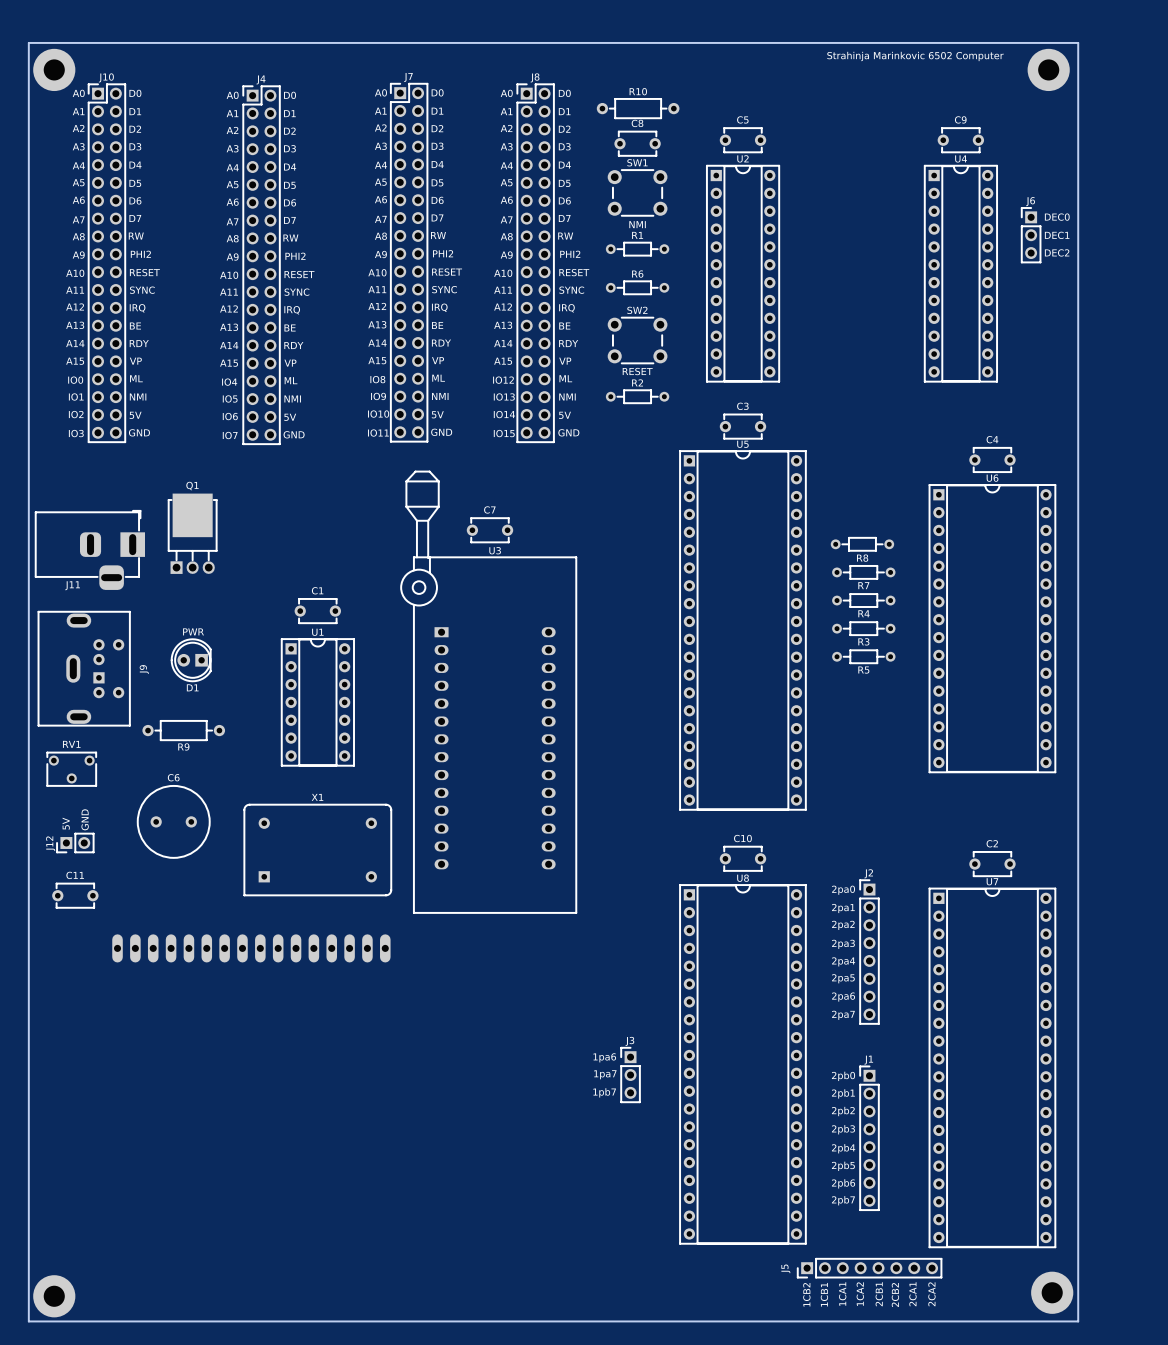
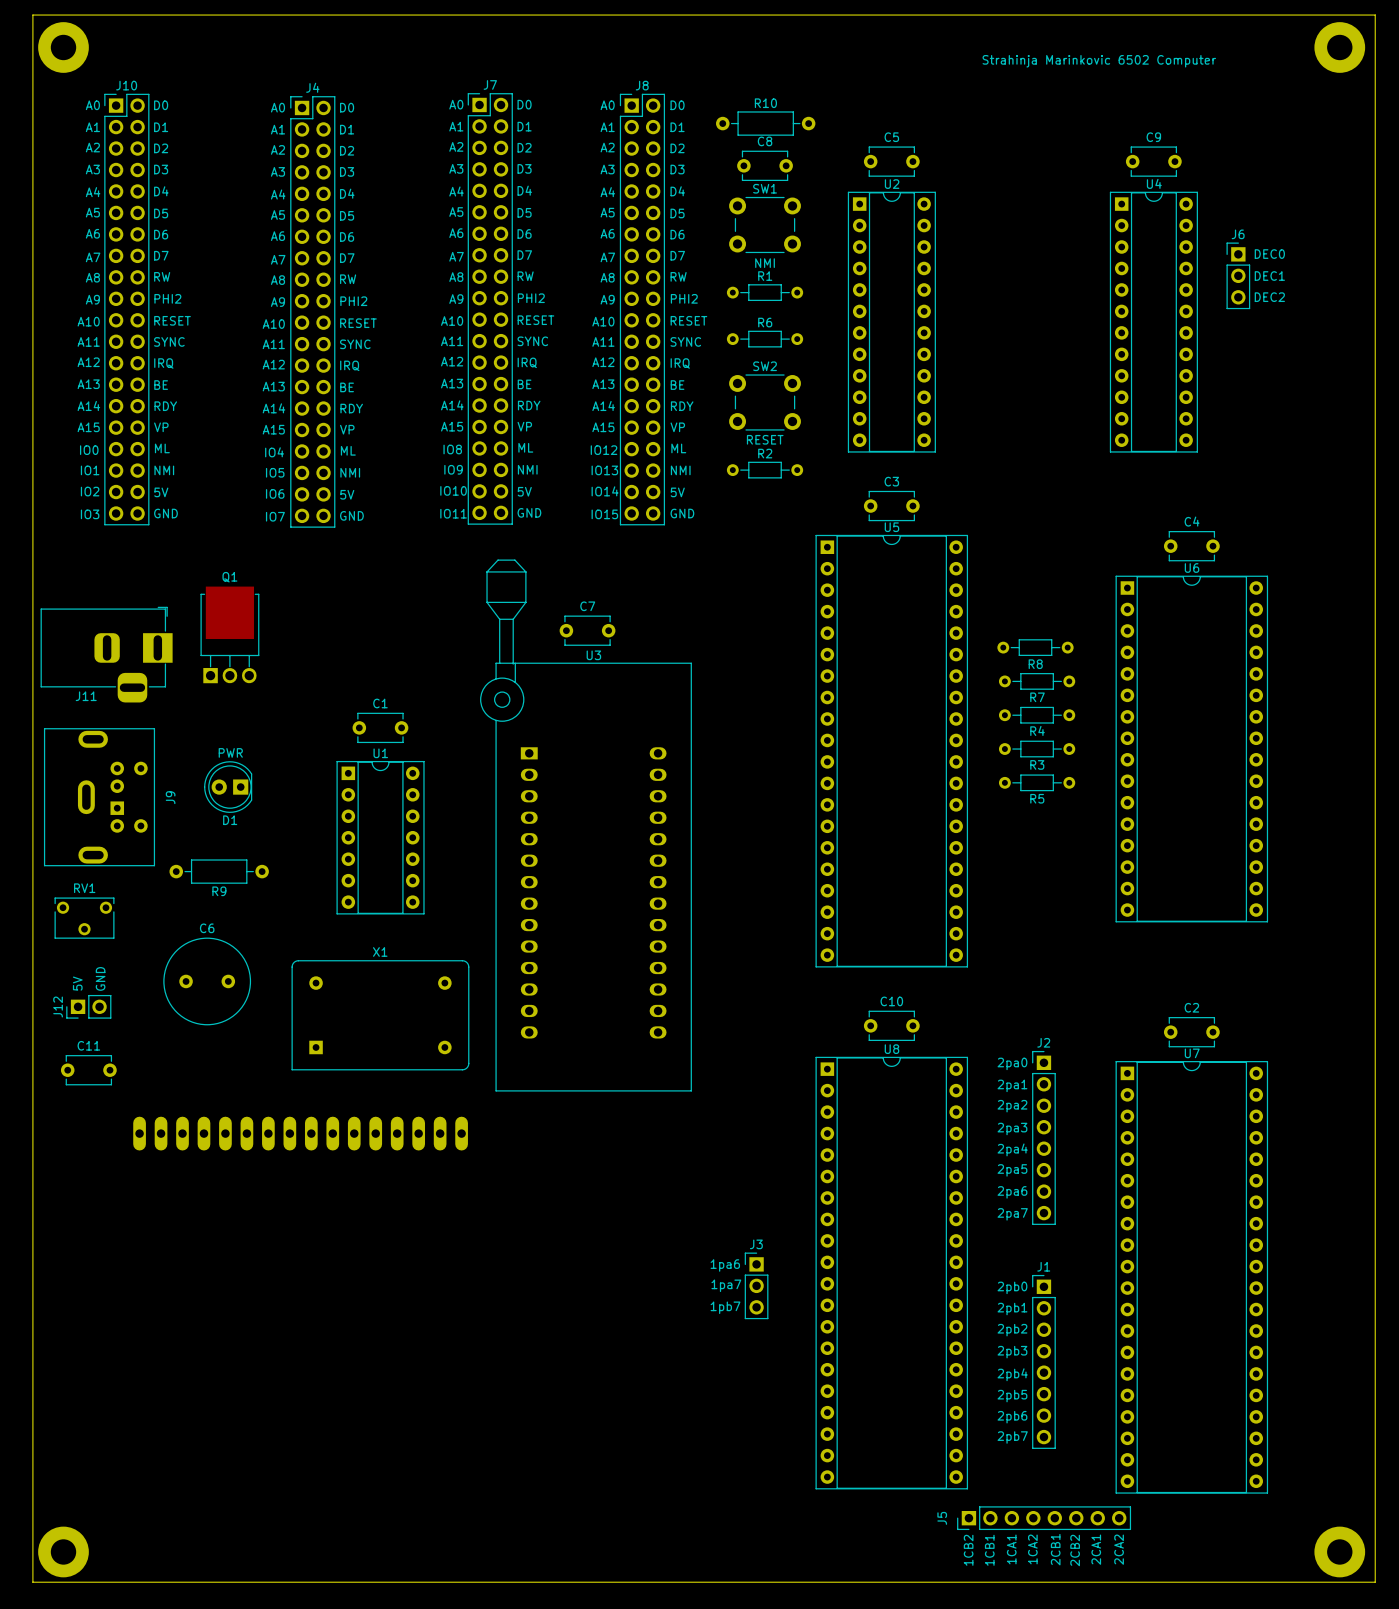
board edge: (28, 42) (1078, 42) (1078, 1321) -> (32, 44) (32, 15) (1375, 15) (1375, 1582) (1294, 1582)
part position: (54, 69) -> (63, 47)
part position: (1048, 69) -> (1339, 47)
part position: (1052, 1292) -> (1339, 1551)

